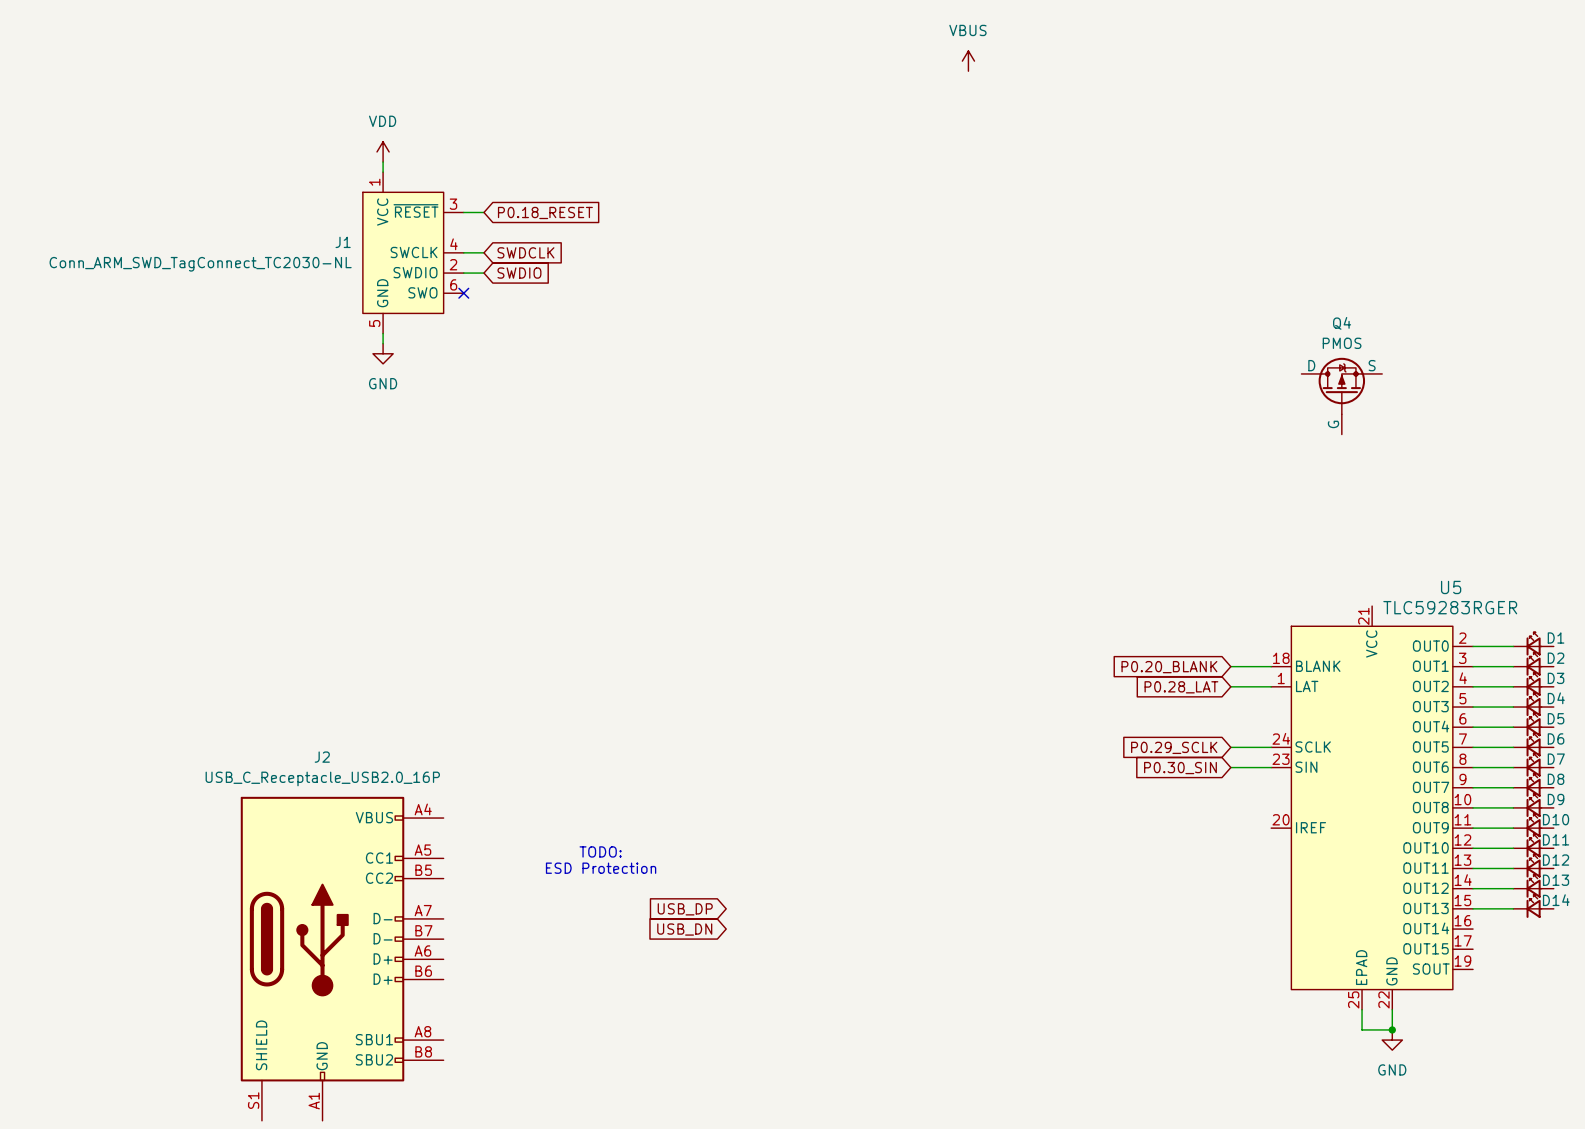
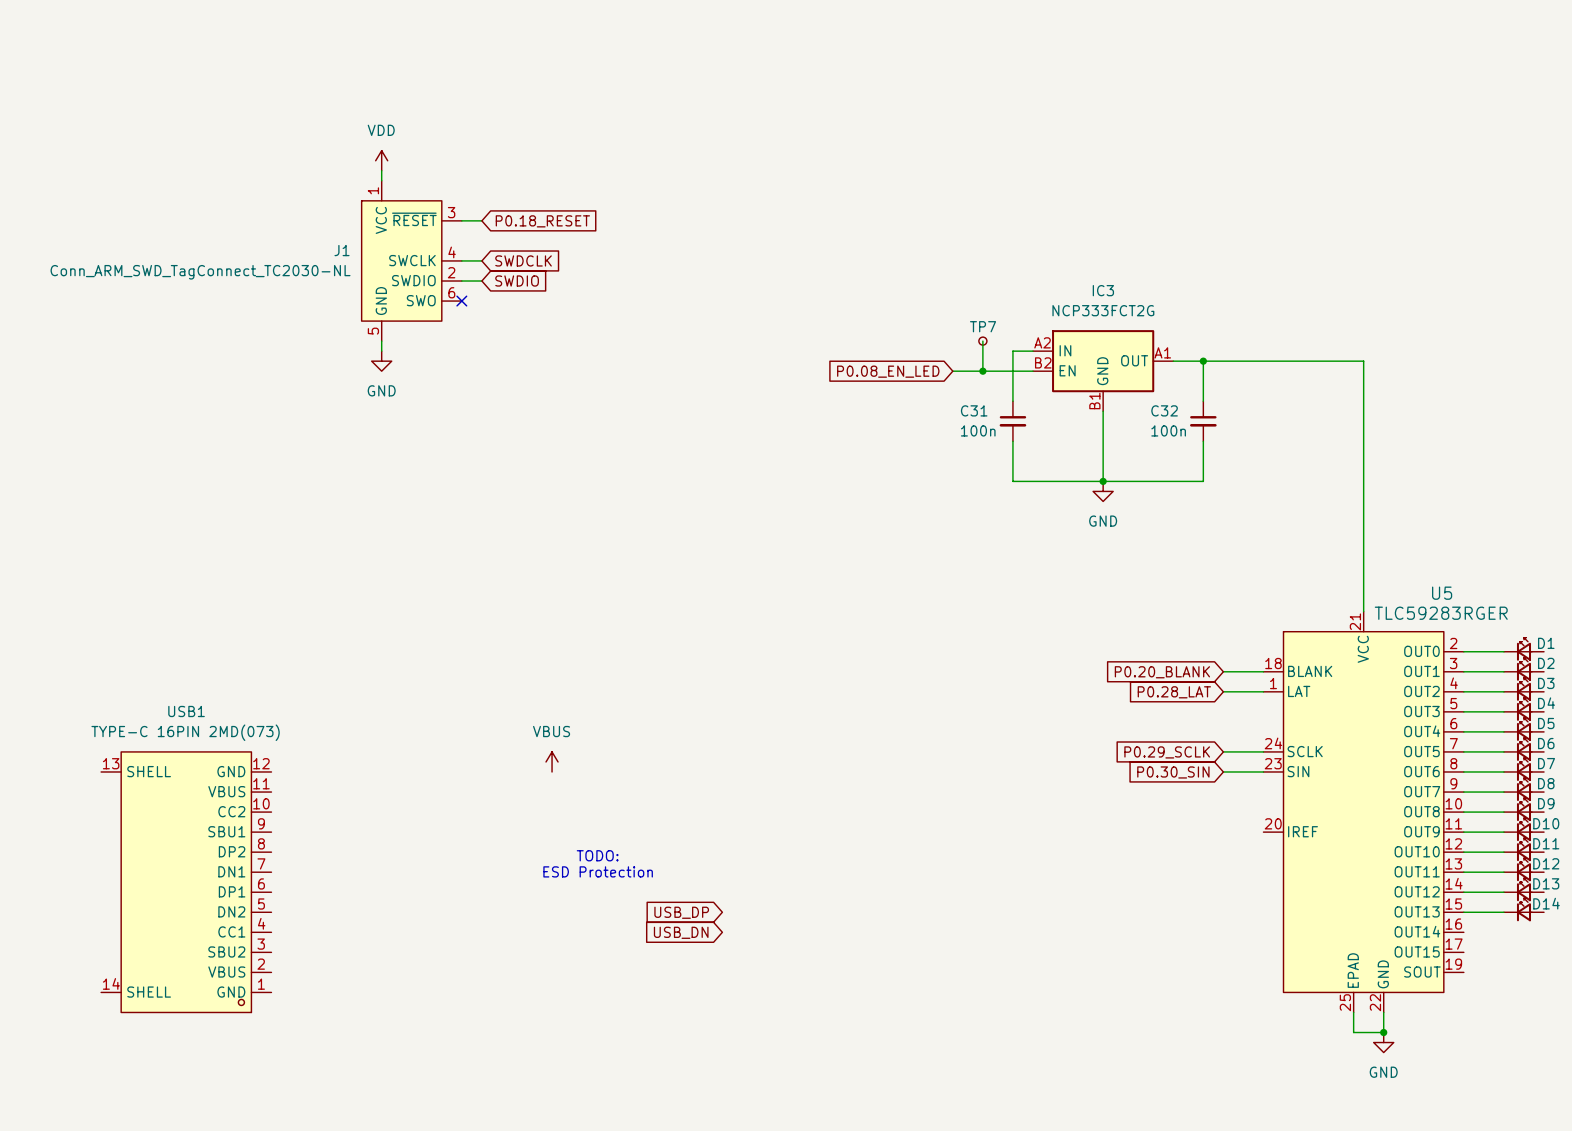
power symbol: VBUS (968, 61) -> none
wire: none -> (982, 341) (982, 371)
TP7: none -> (982, 341)
wire: none -> (1032, 351) (1012, 351) (1012, 401)
wire: none -> (1173, 361) (1363, 361) (1363, 611)
wire: none -> (1203, 361) (1203, 401)
junction: none -> (1203, 361)
wire: none -> (952, 371) (1032, 371)
junction: none -> (982, 371)
IC3: none -> NCP333FCT2G (1103, 370)
global label: none -> P0.08_EN_LED (888, 371)
Q4: PMOS (1341, 396) -> none
wire: none -> (1103, 411) (1103, 481)
C31: none -> 100n (1012, 421)
C32: none -> 100n (1203, 421)
wire: none -> (1012, 441) (1012, 481) (1203, 481) (1203, 441)
junction: none -> (1103, 481)
power symbol: none -> GND (1103, 491)
power symbol: none -> VBUS (552, 761)
USB1: none -> TYPE-C 16PIN 2MD(073) (186, 882)
J2: USB_C_Receptacle_USB2.0_16P (342, 958) -> none

